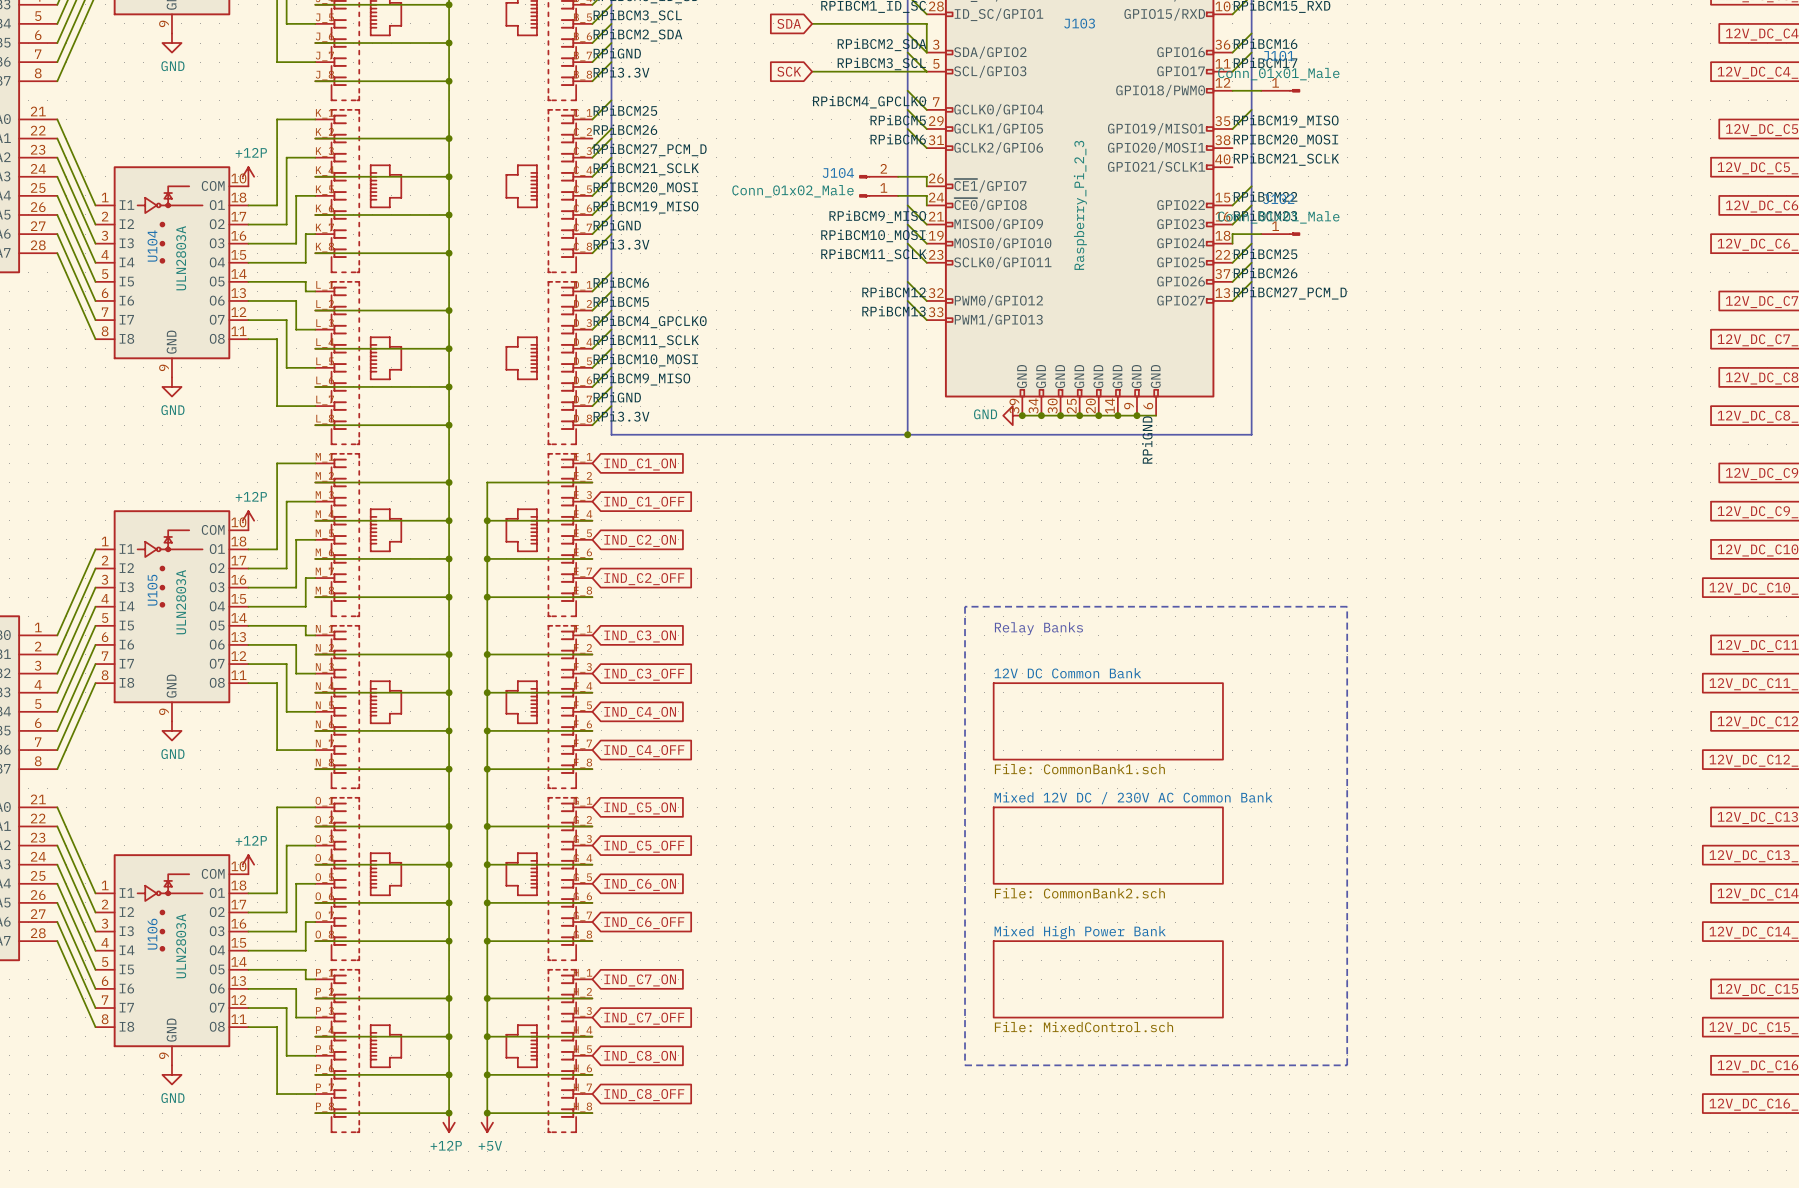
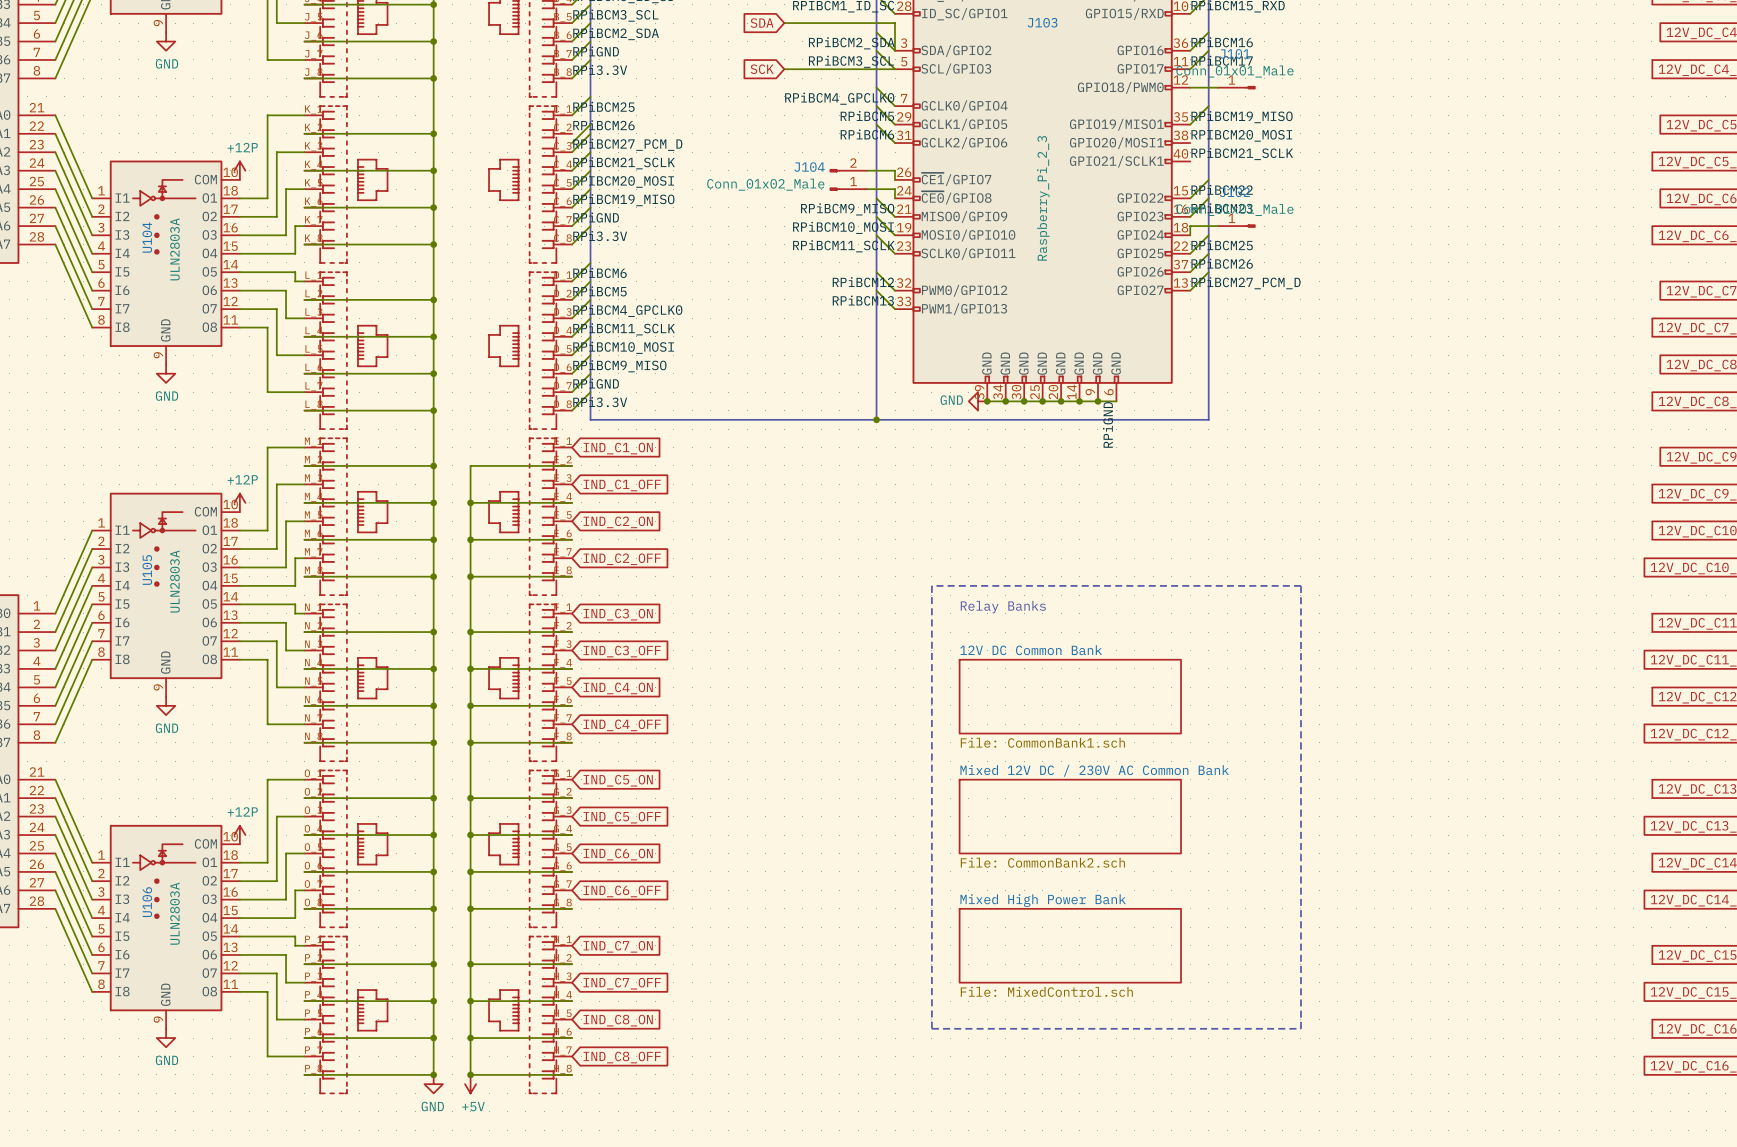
power symbol: +12P (449, 1122) -> GND (433, 1084)

